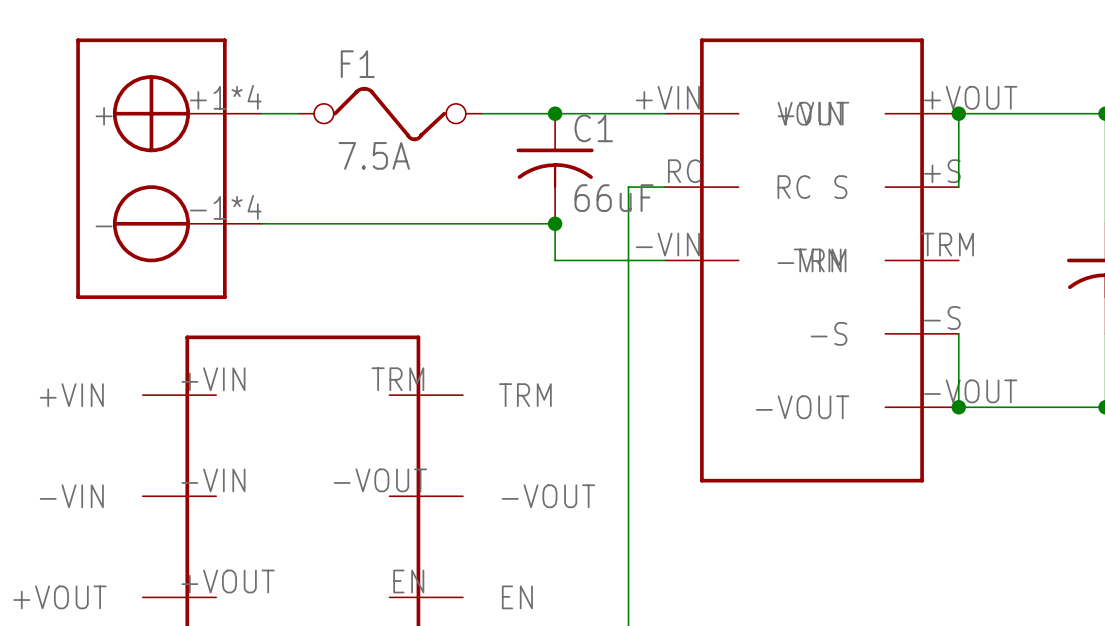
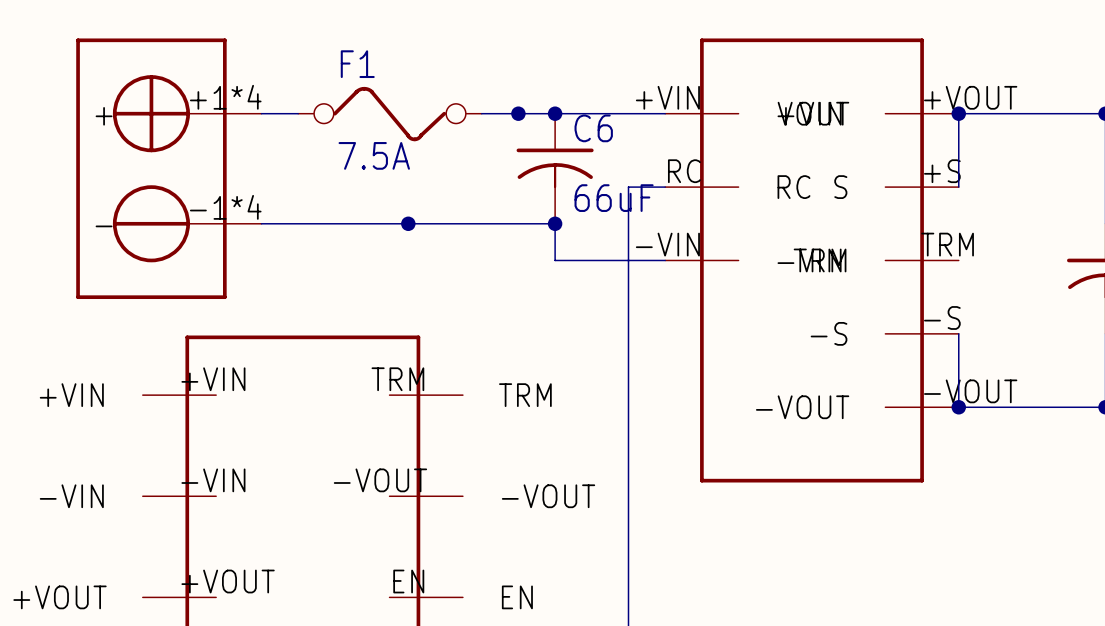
junction: none -> (518, 113)
C1 name: C1 (593, 128) -> C6 (593, 128)
junction: none -> (408, 223)

